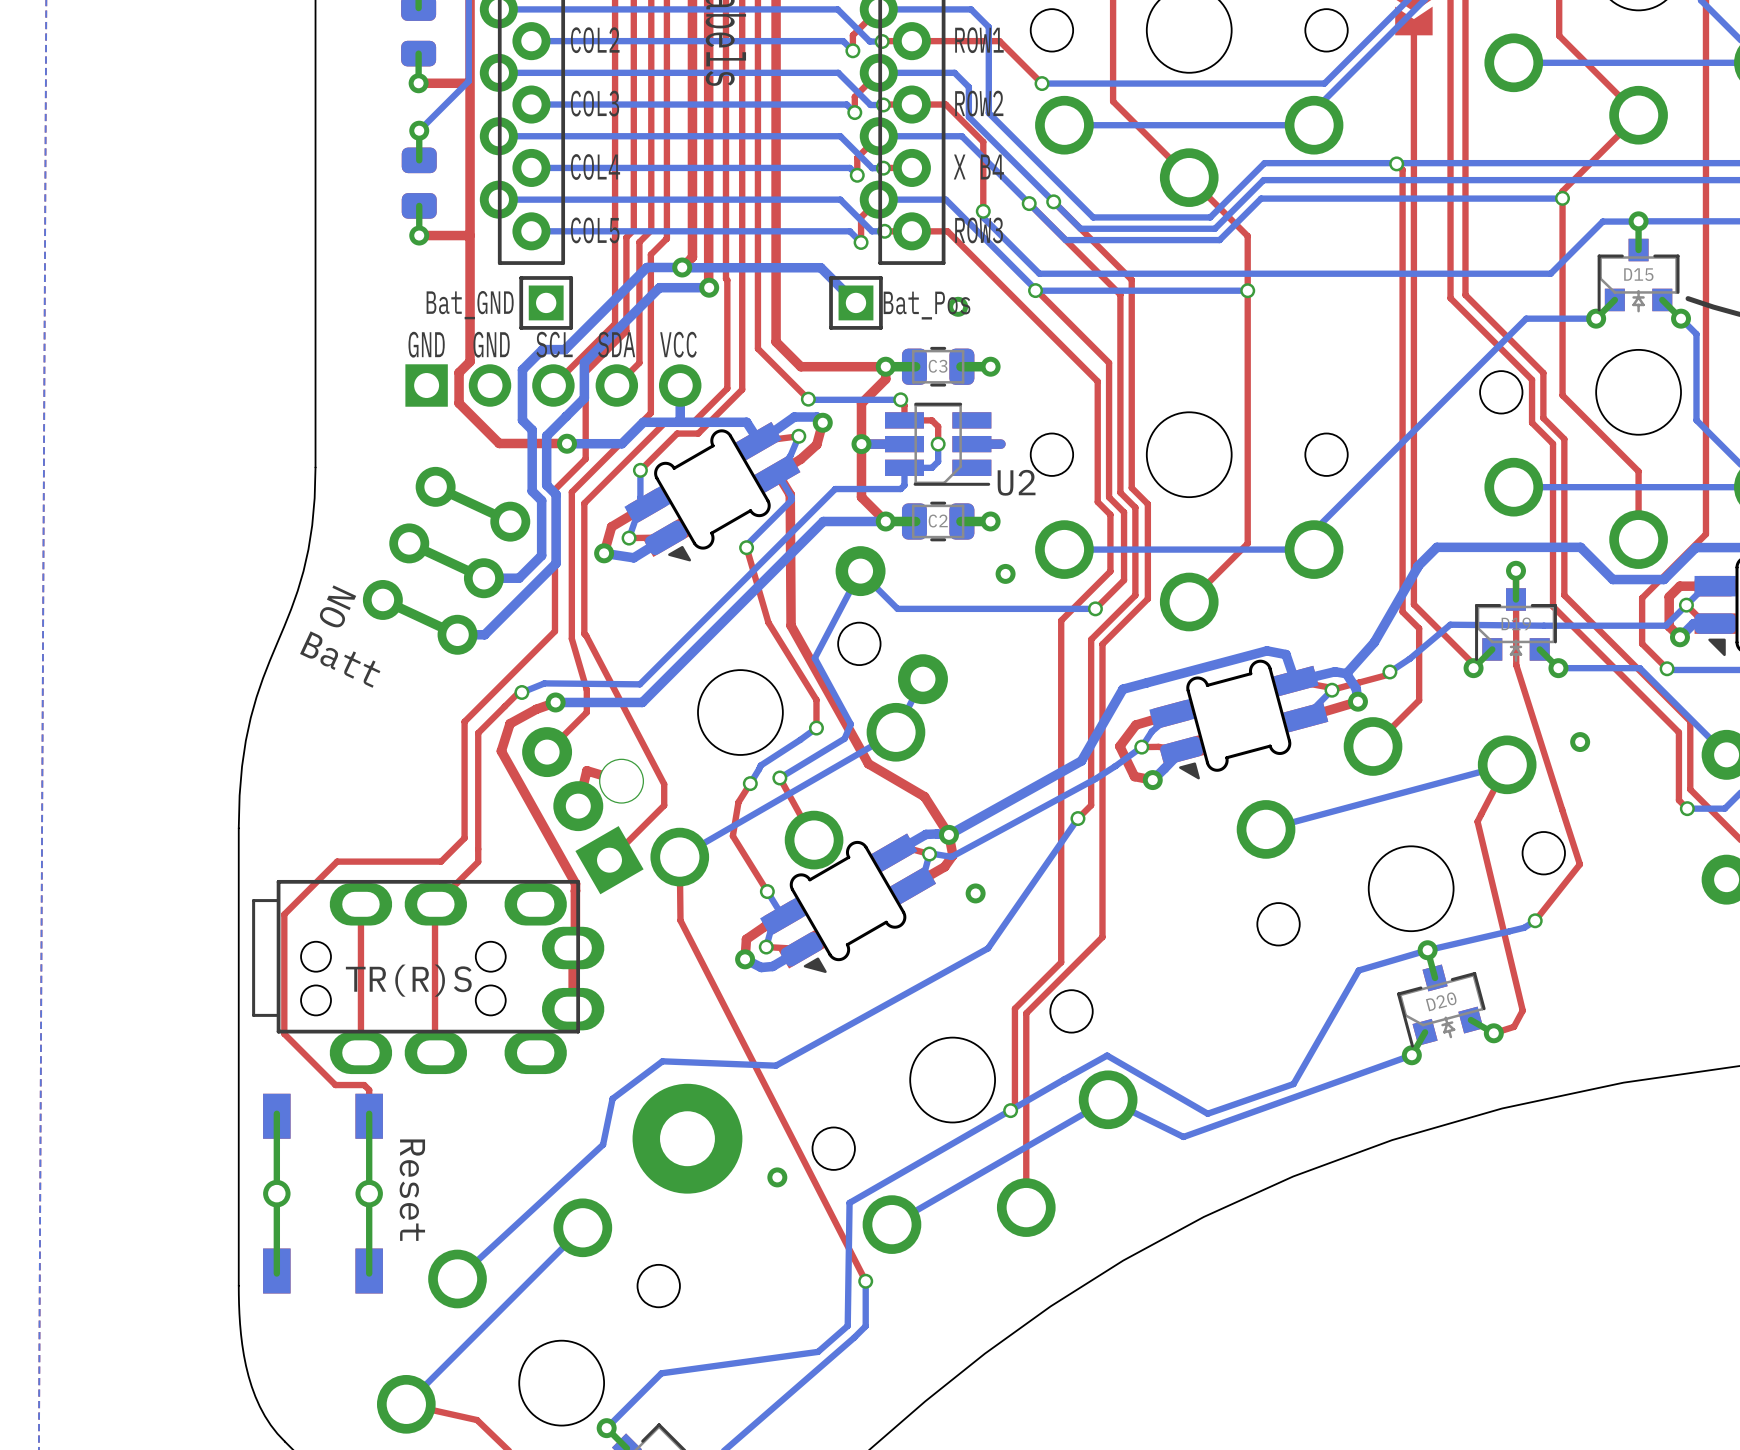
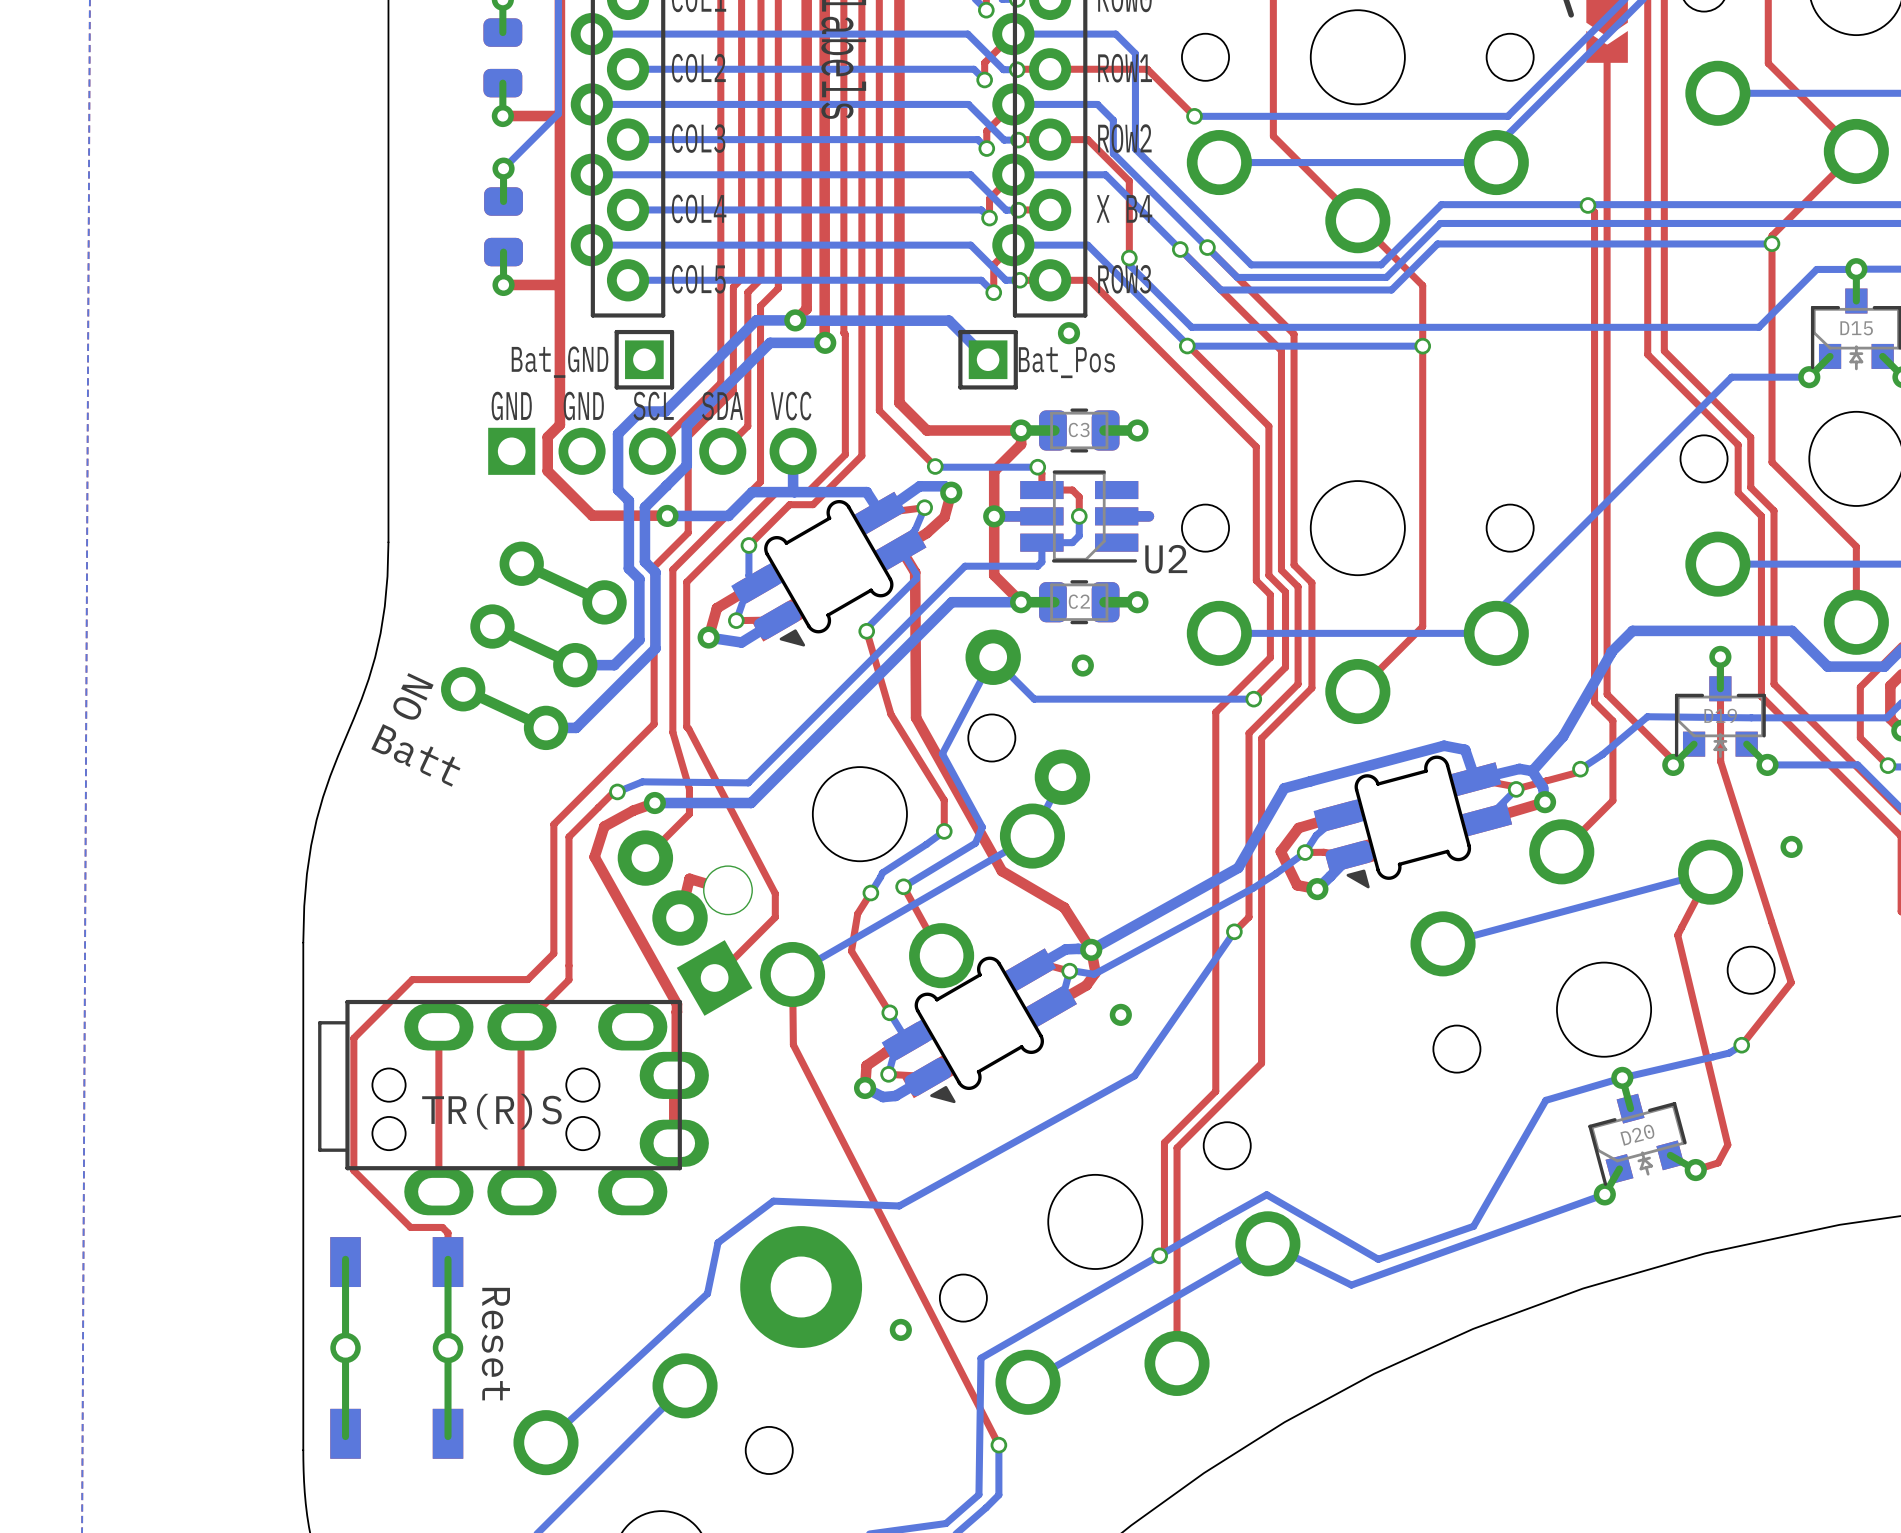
part position: (958, 306) -> (1068, 333)
part position: (1005, 573) -> (1082, 665)

